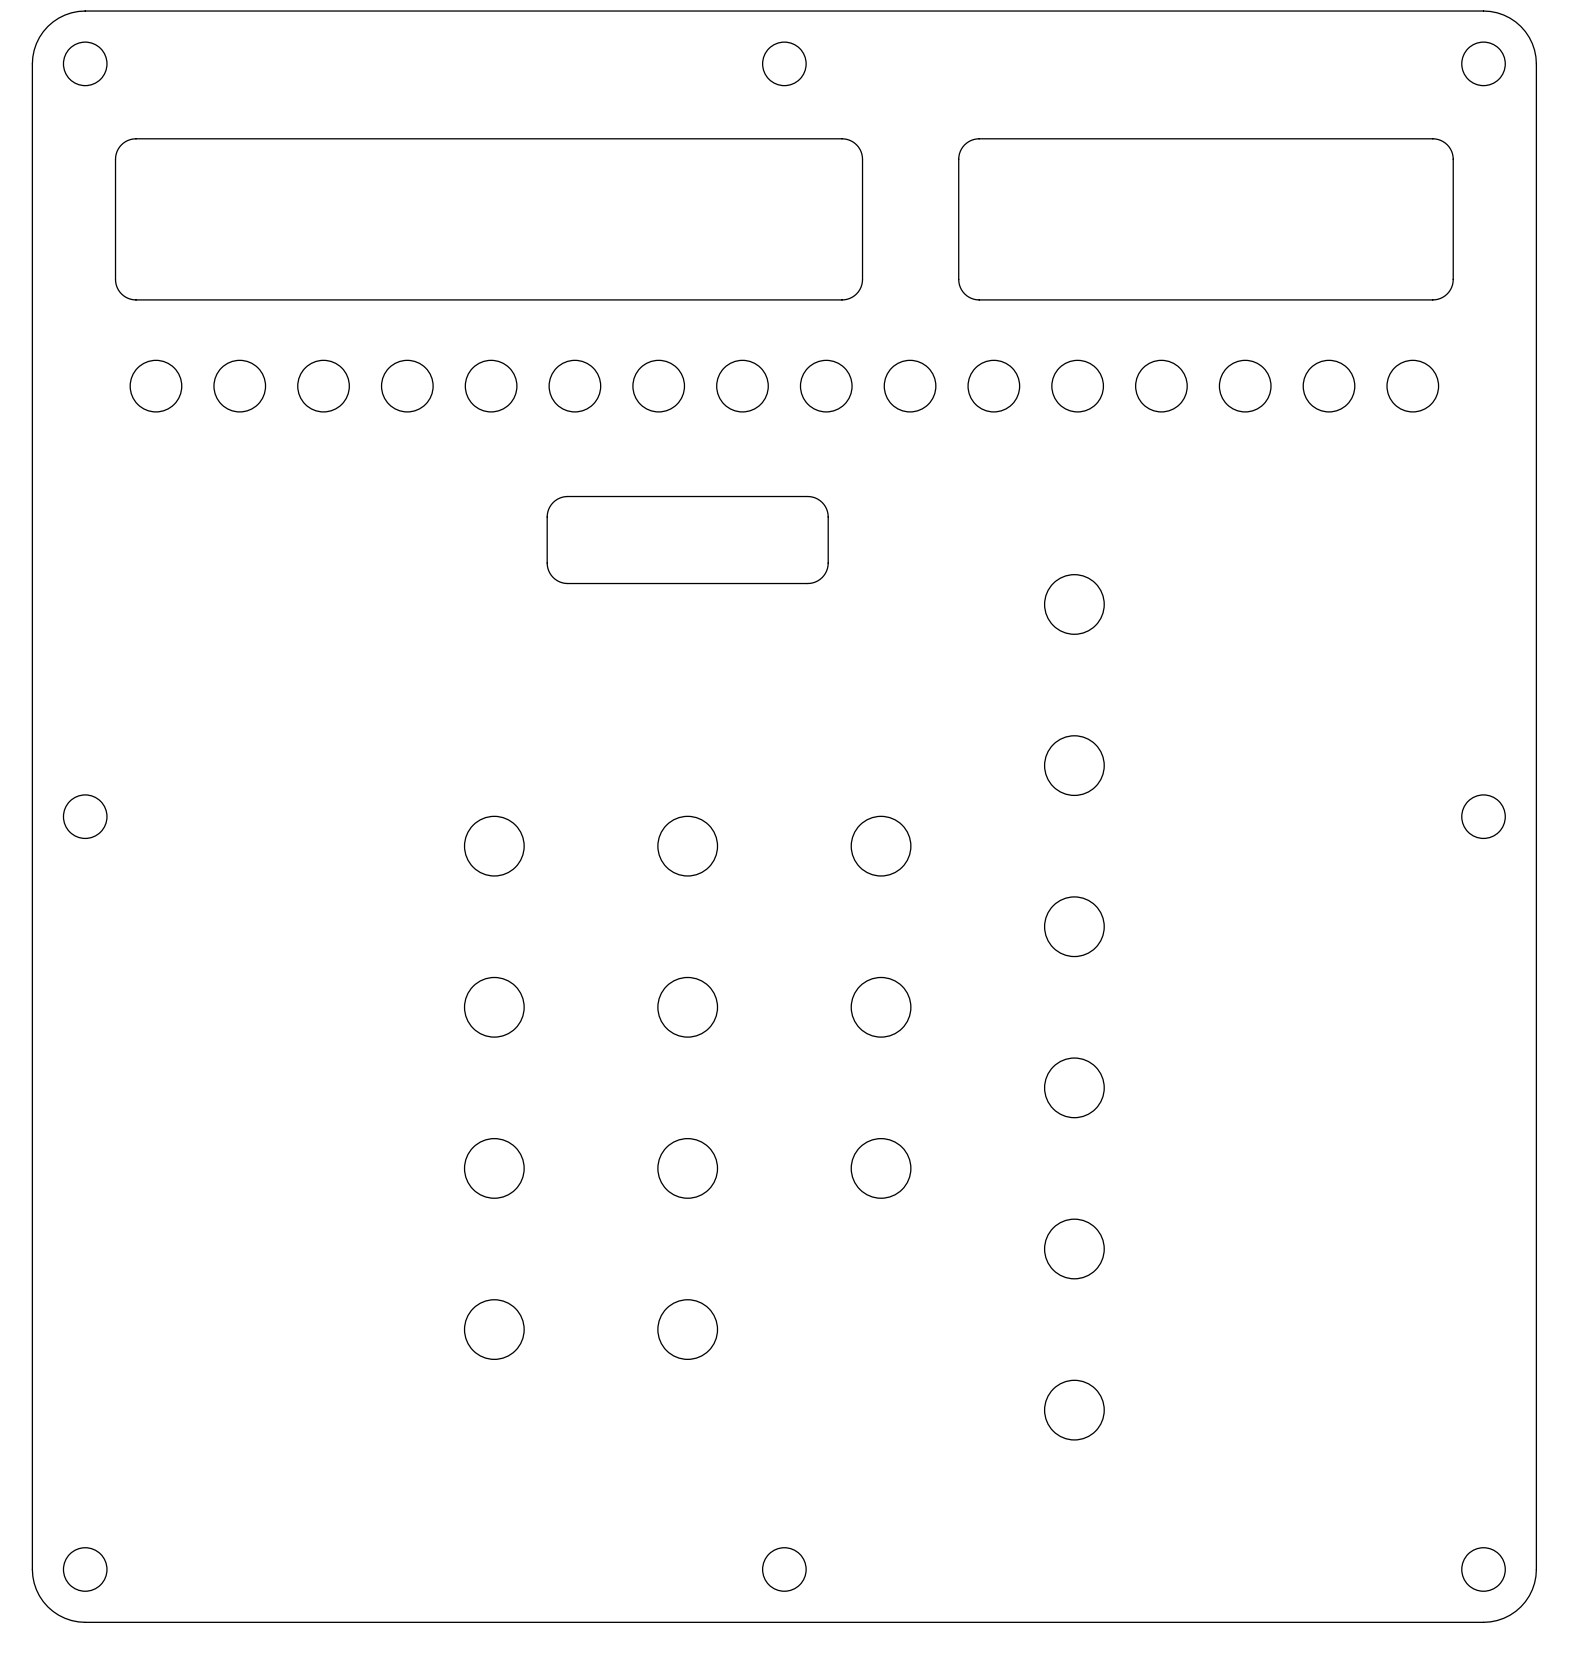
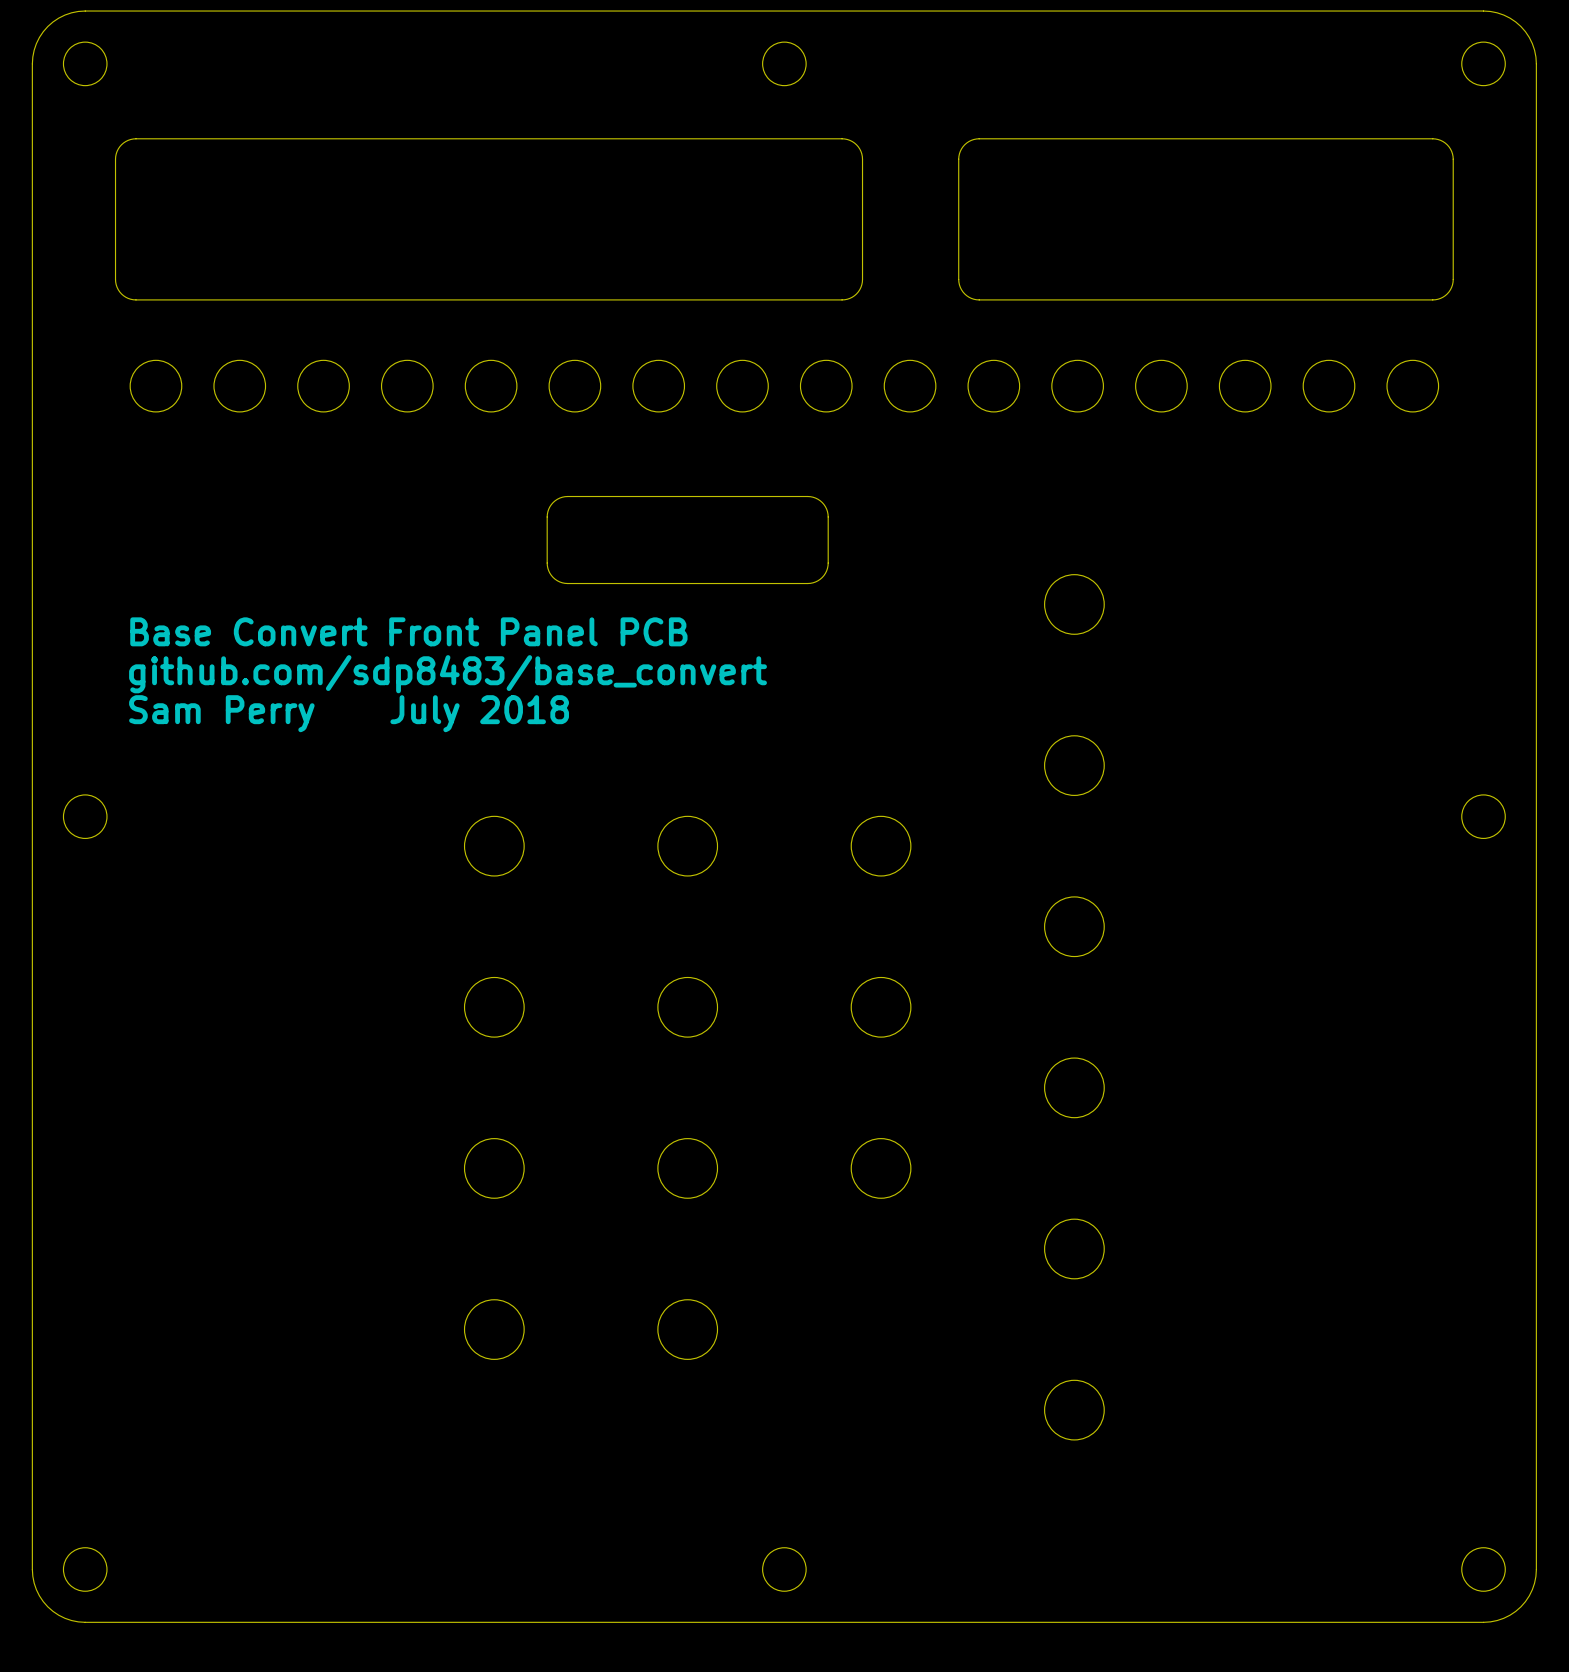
text: none -> Base Convert Front Panel PCB (408, 631)
text: none -> github.com/sdp8483/base_convert (448, 674)
text: none -> Sam Perry July 2018 (349, 713)

